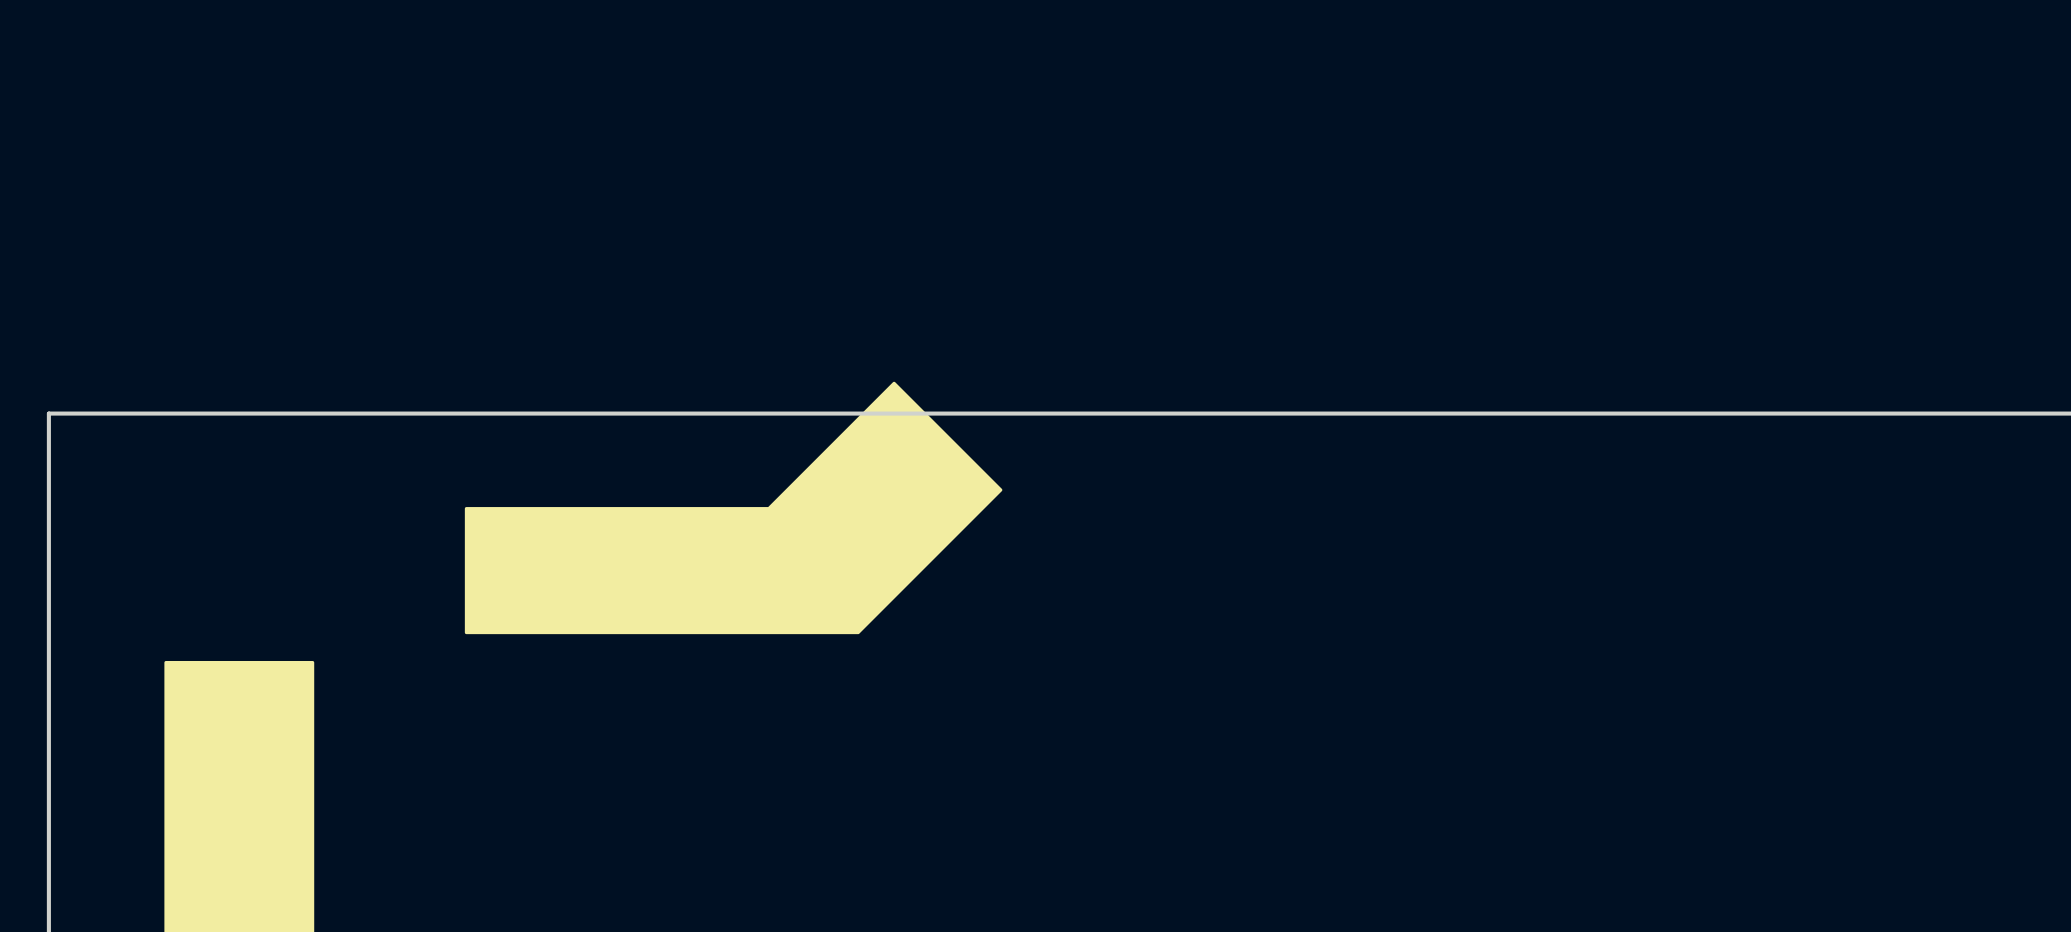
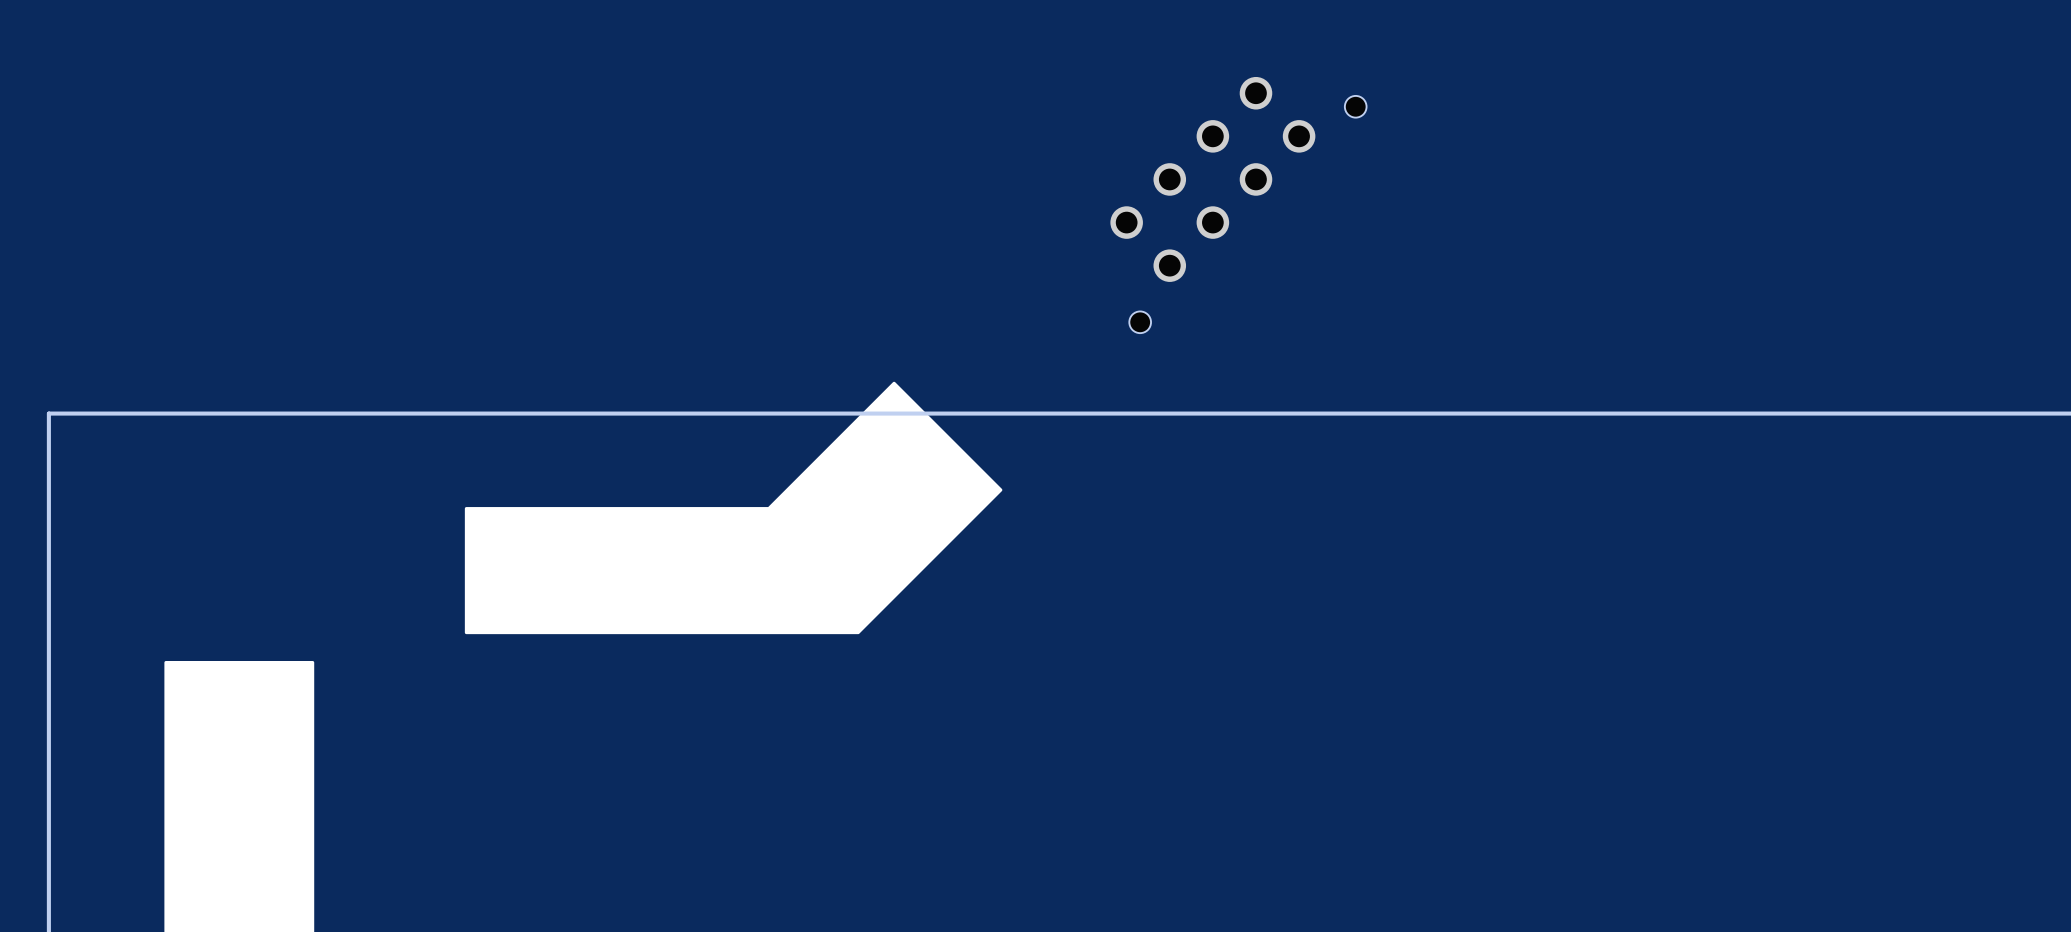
part: none -> (1238, 205)

